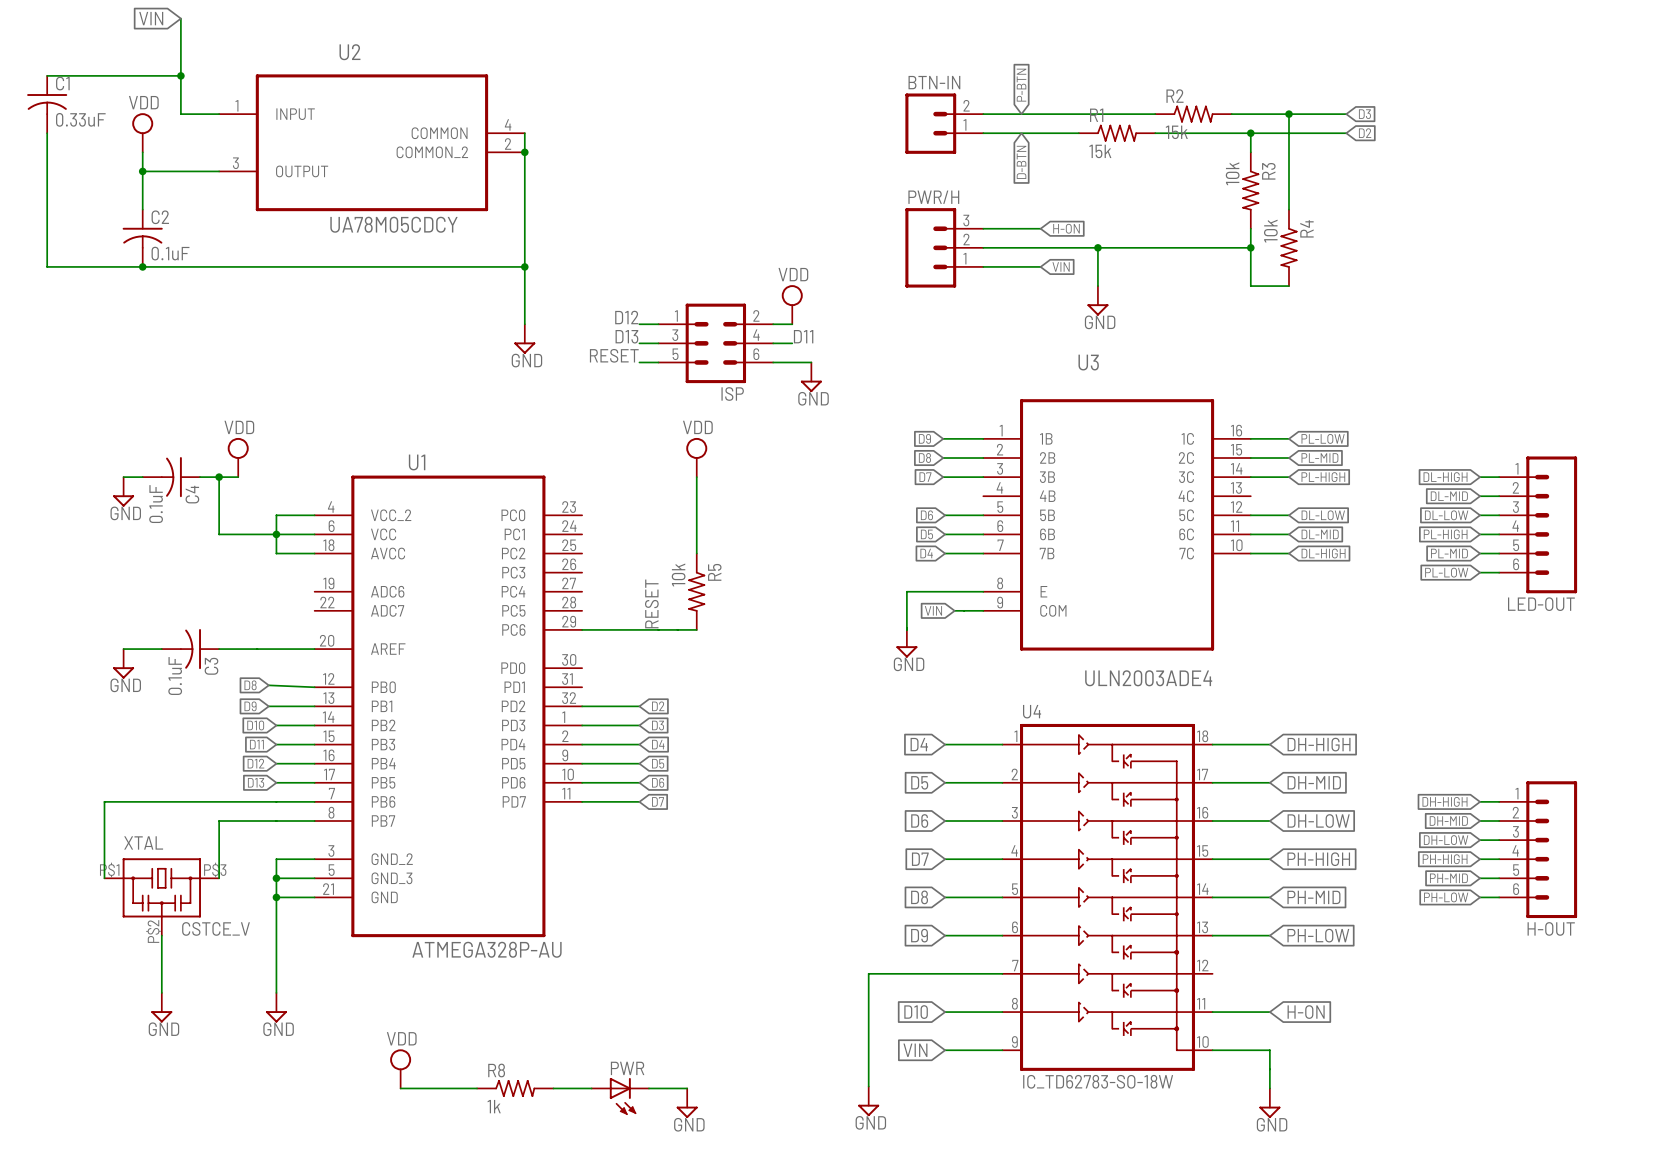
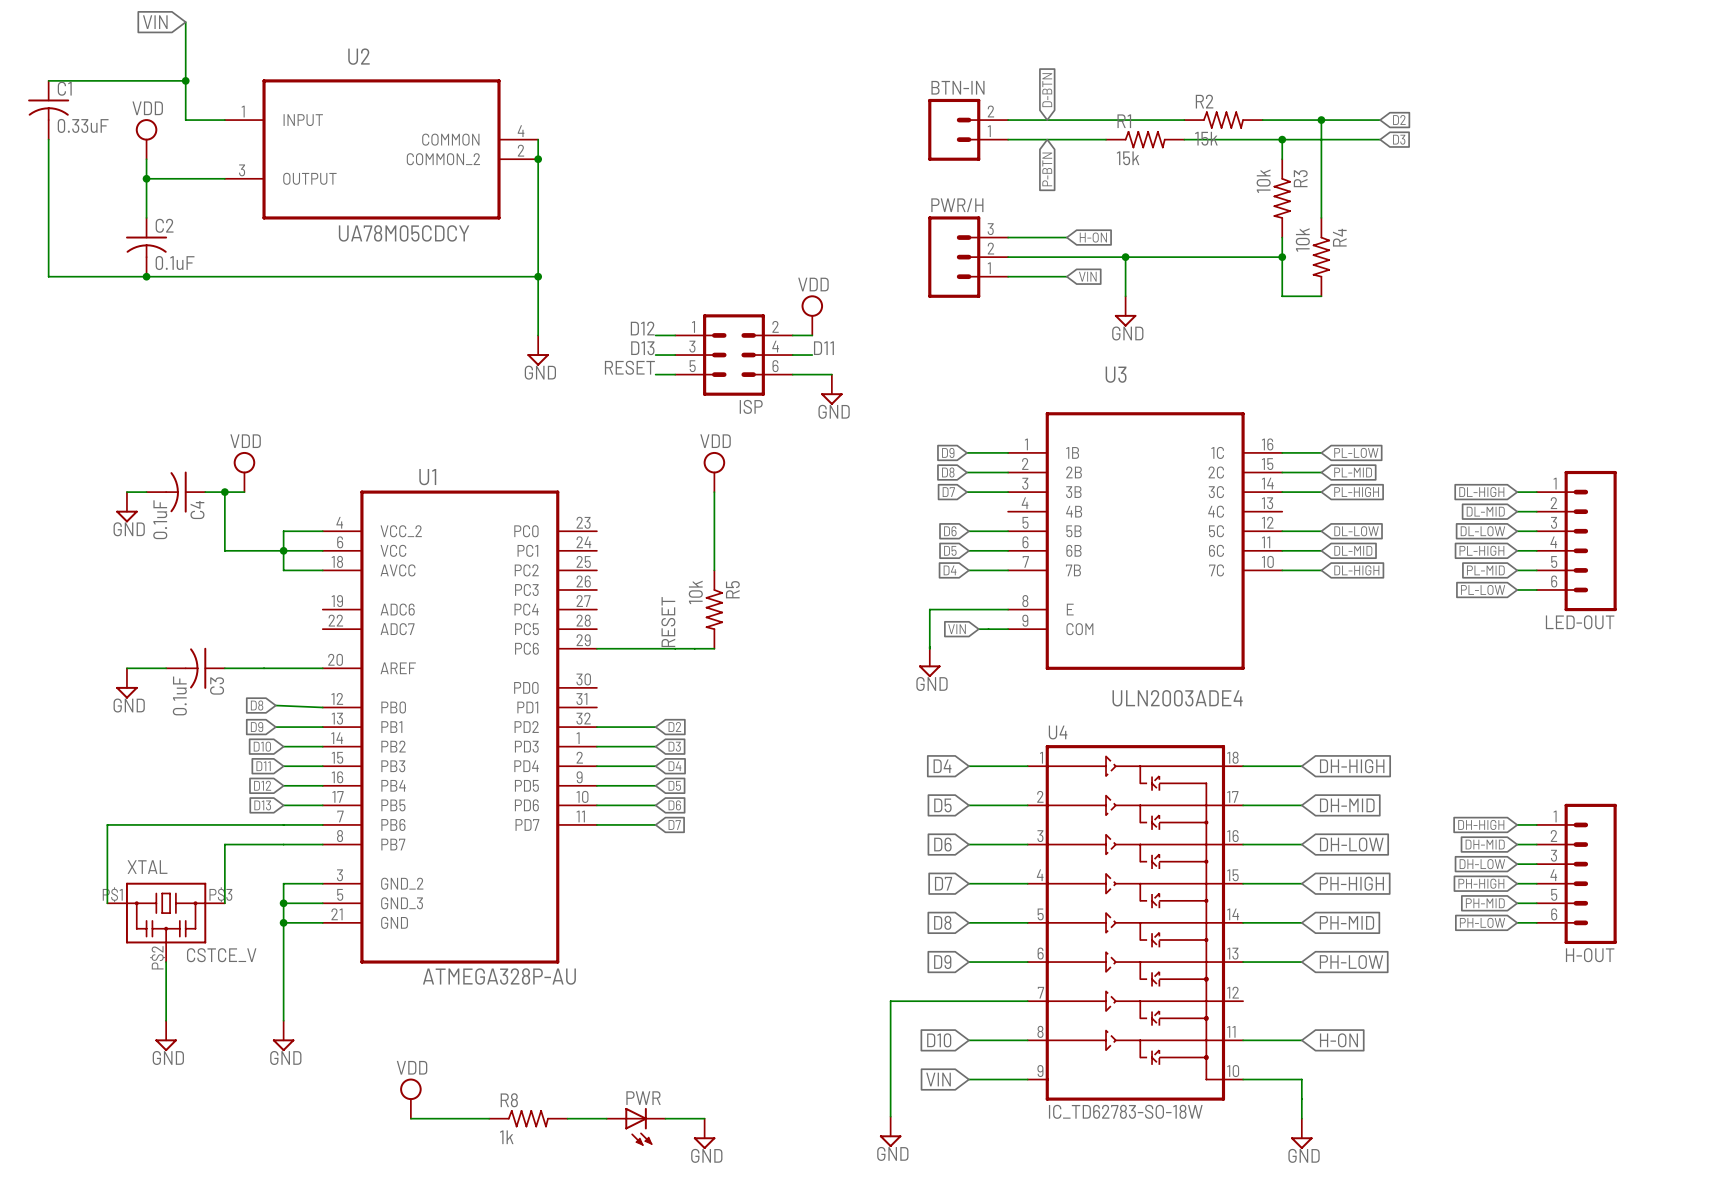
global label: P-BTN (1021, 85) -> D-BTN (1047, 90)
global label: D3 (1364, 114) -> D2 (1399, 119)
global label: D2 (1365, 133) -> D3 (1399, 139)
global label: D-BTN (1021, 162) -> P-BTN (1047, 169)

